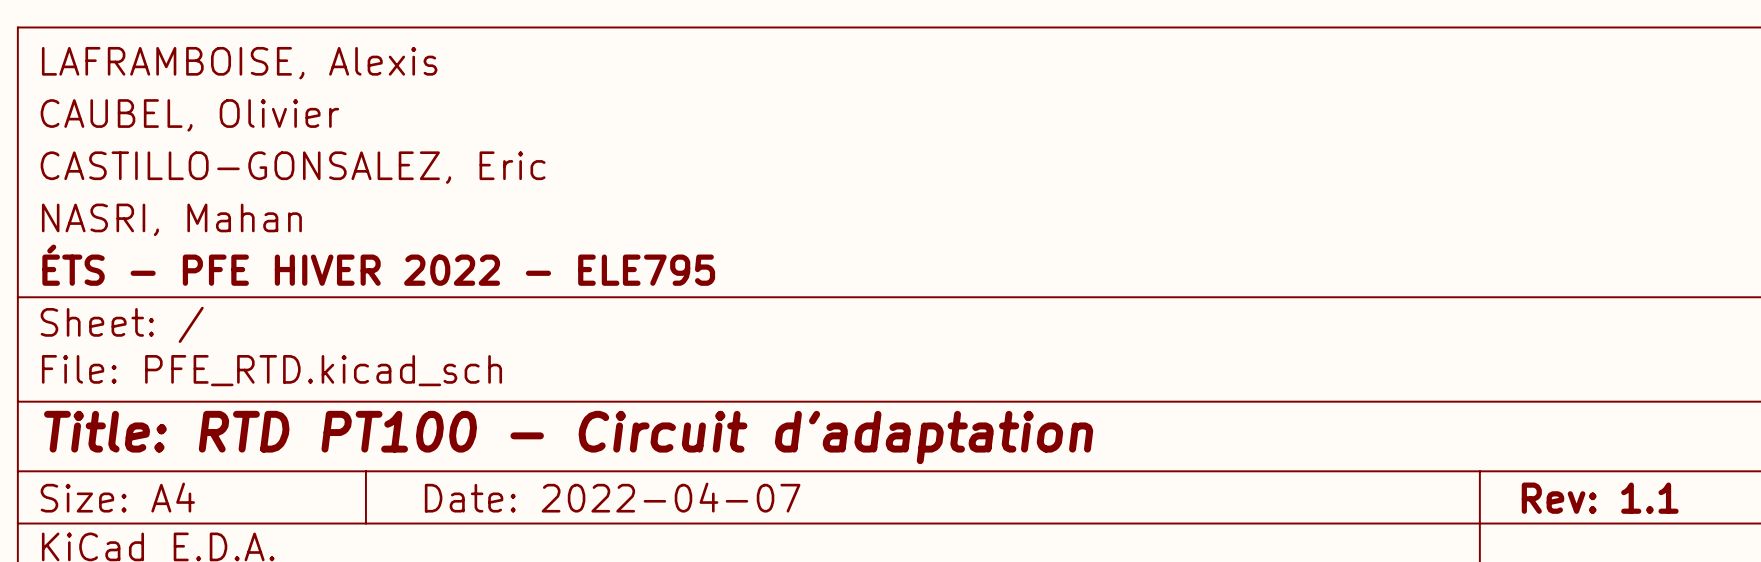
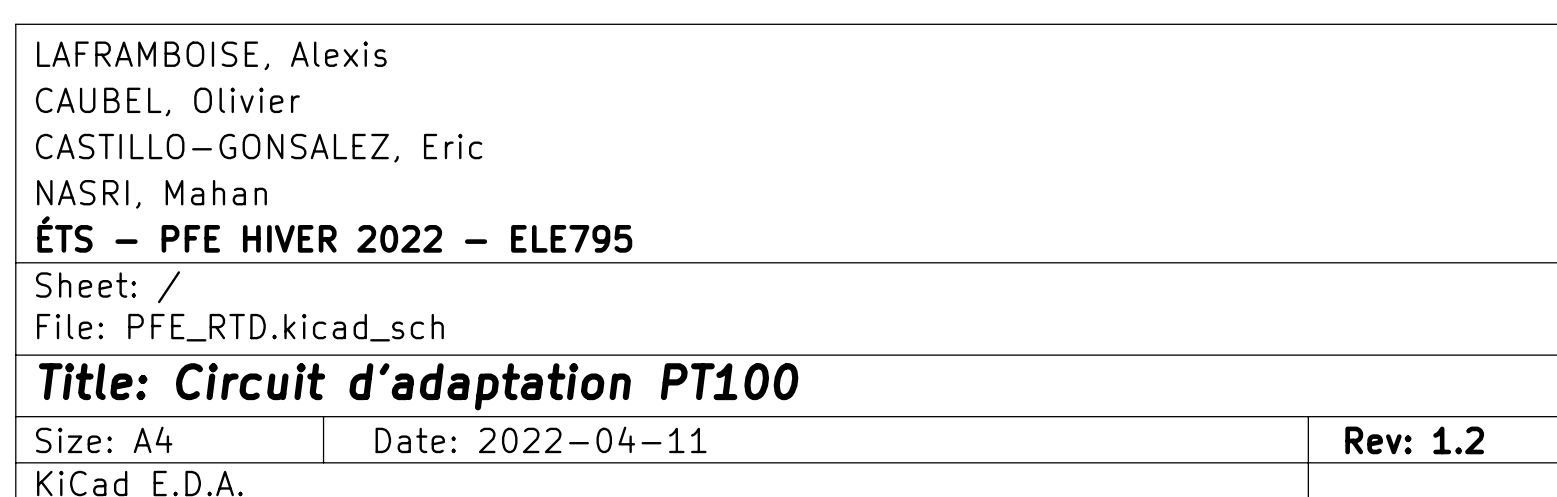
title block: Title: RTD PT100 - Circuit d'adaptation (568, 437) -> Title: Circuit d'adaptation PT100 (418, 386)
title block: Date: 2022-04-07 (612, 497) -> Date: 2022-04-11 (541, 439)
title block: Rev: 1.1 (1600, 498) -> Rev: 1.2 (1414, 440)

